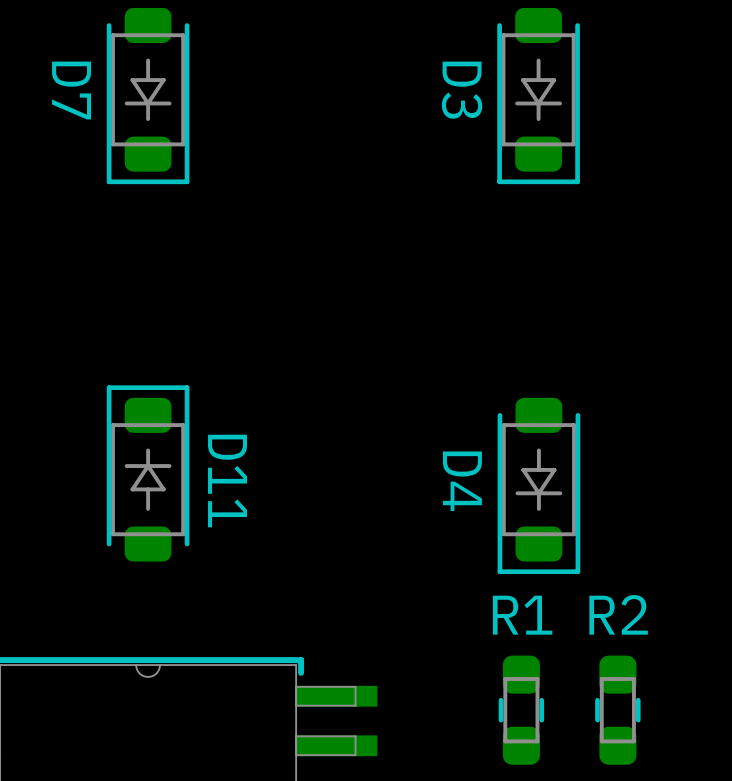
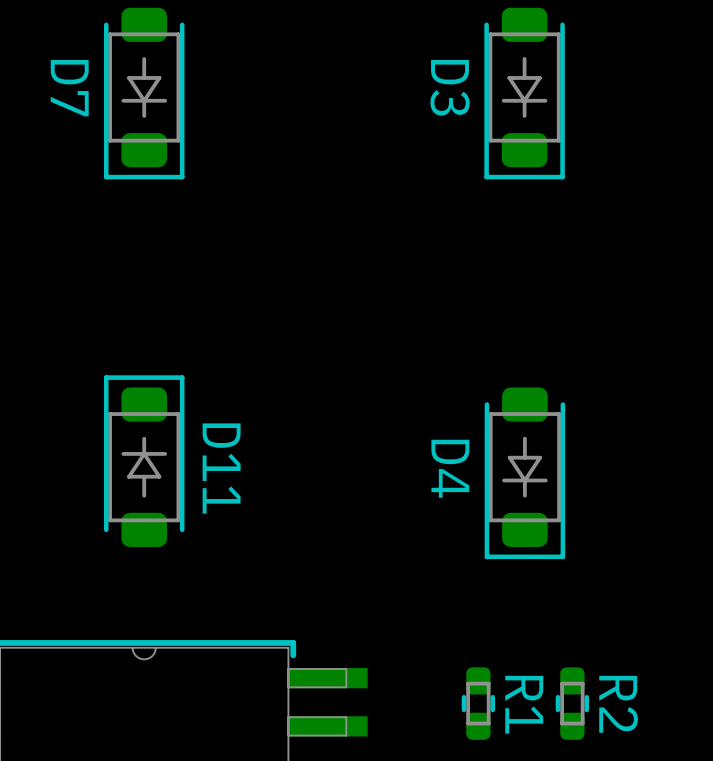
R2 name position: R2 (618, 614) -> R2 (618, 704)
R1 name position: R1 (522, 615) -> R1 (524, 704)
R1 footprint: [498, 655, 545, 765] -> [461, 667, 496, 740]
R2 footprint: [595, 655, 641, 765] -> [555, 667, 590, 740]

